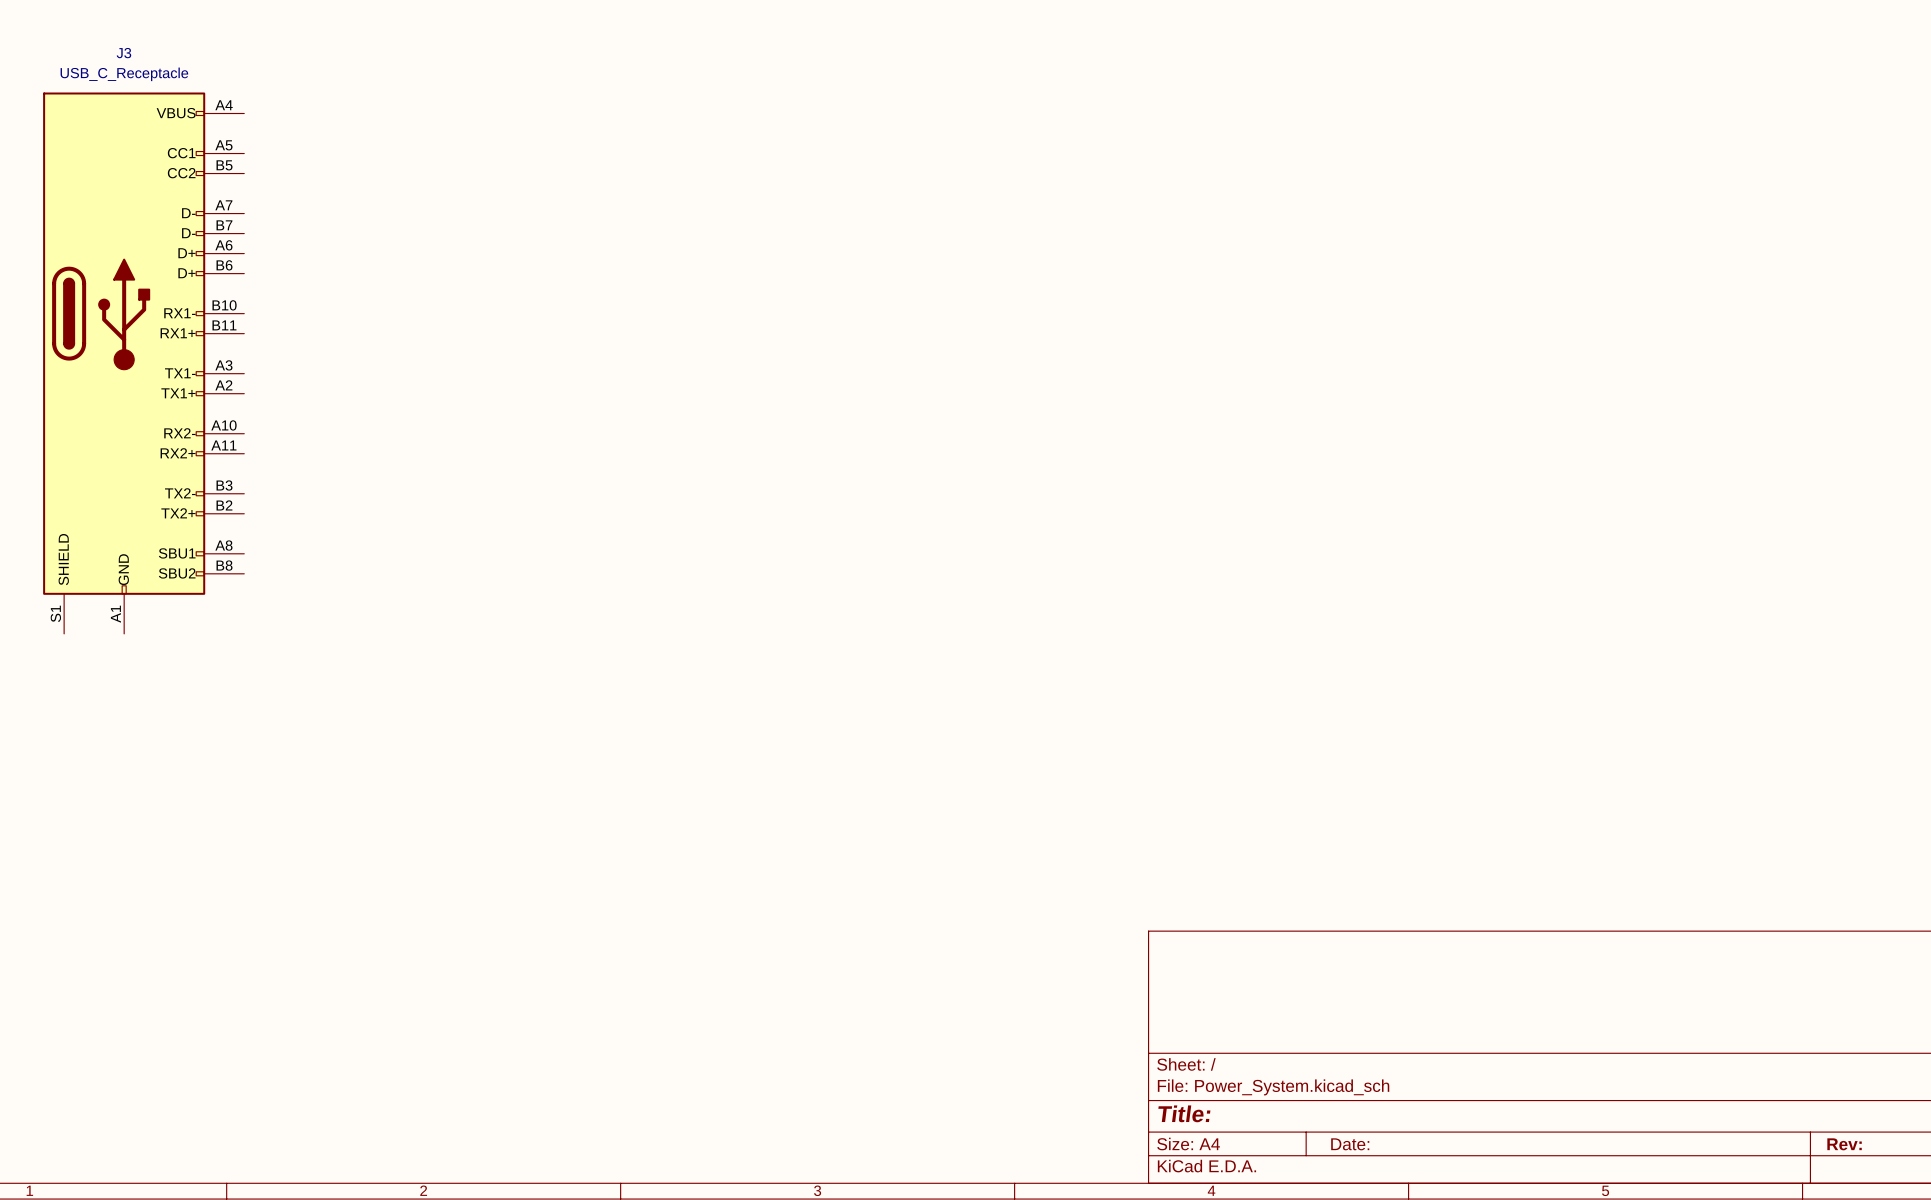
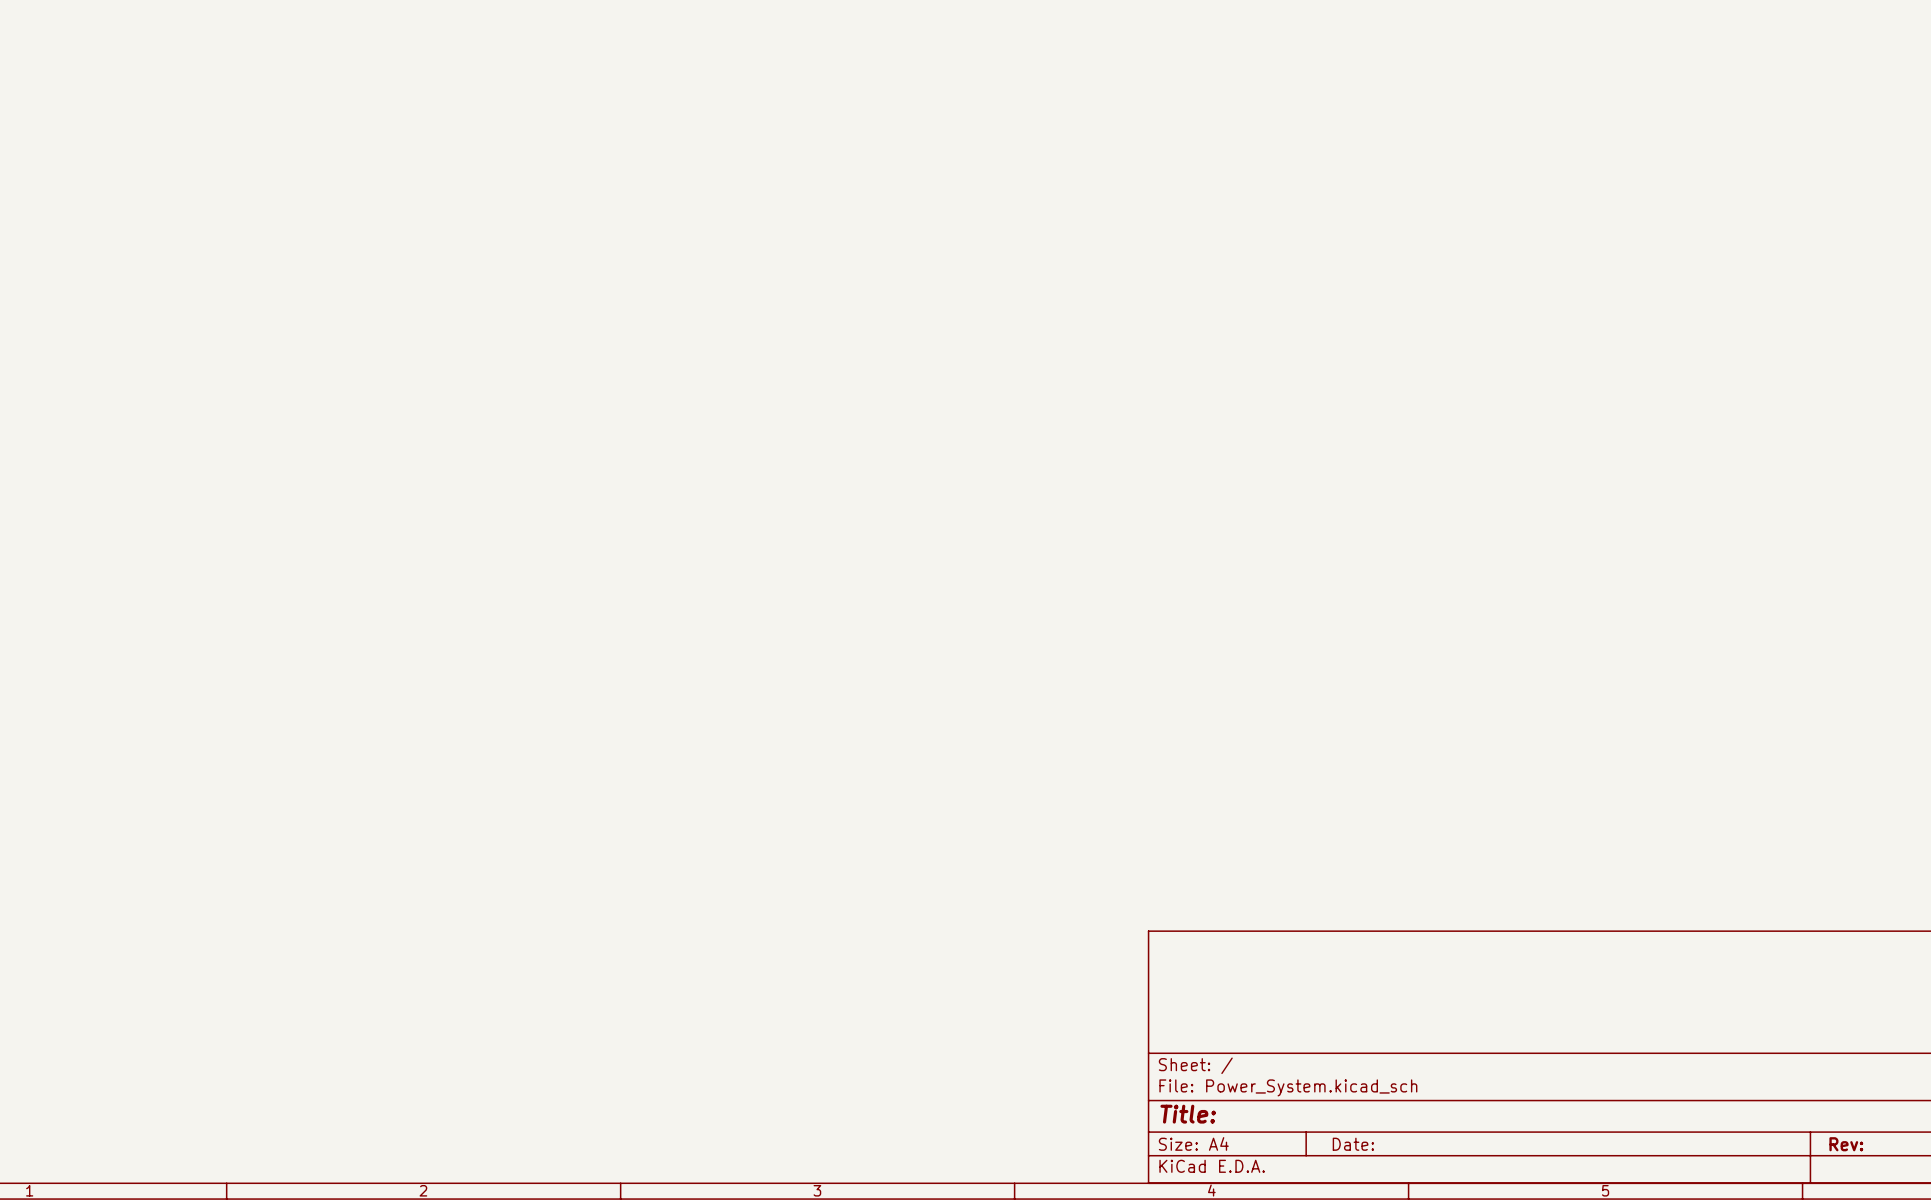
J3: USB_C_Receptacle (143, 363) -> none

